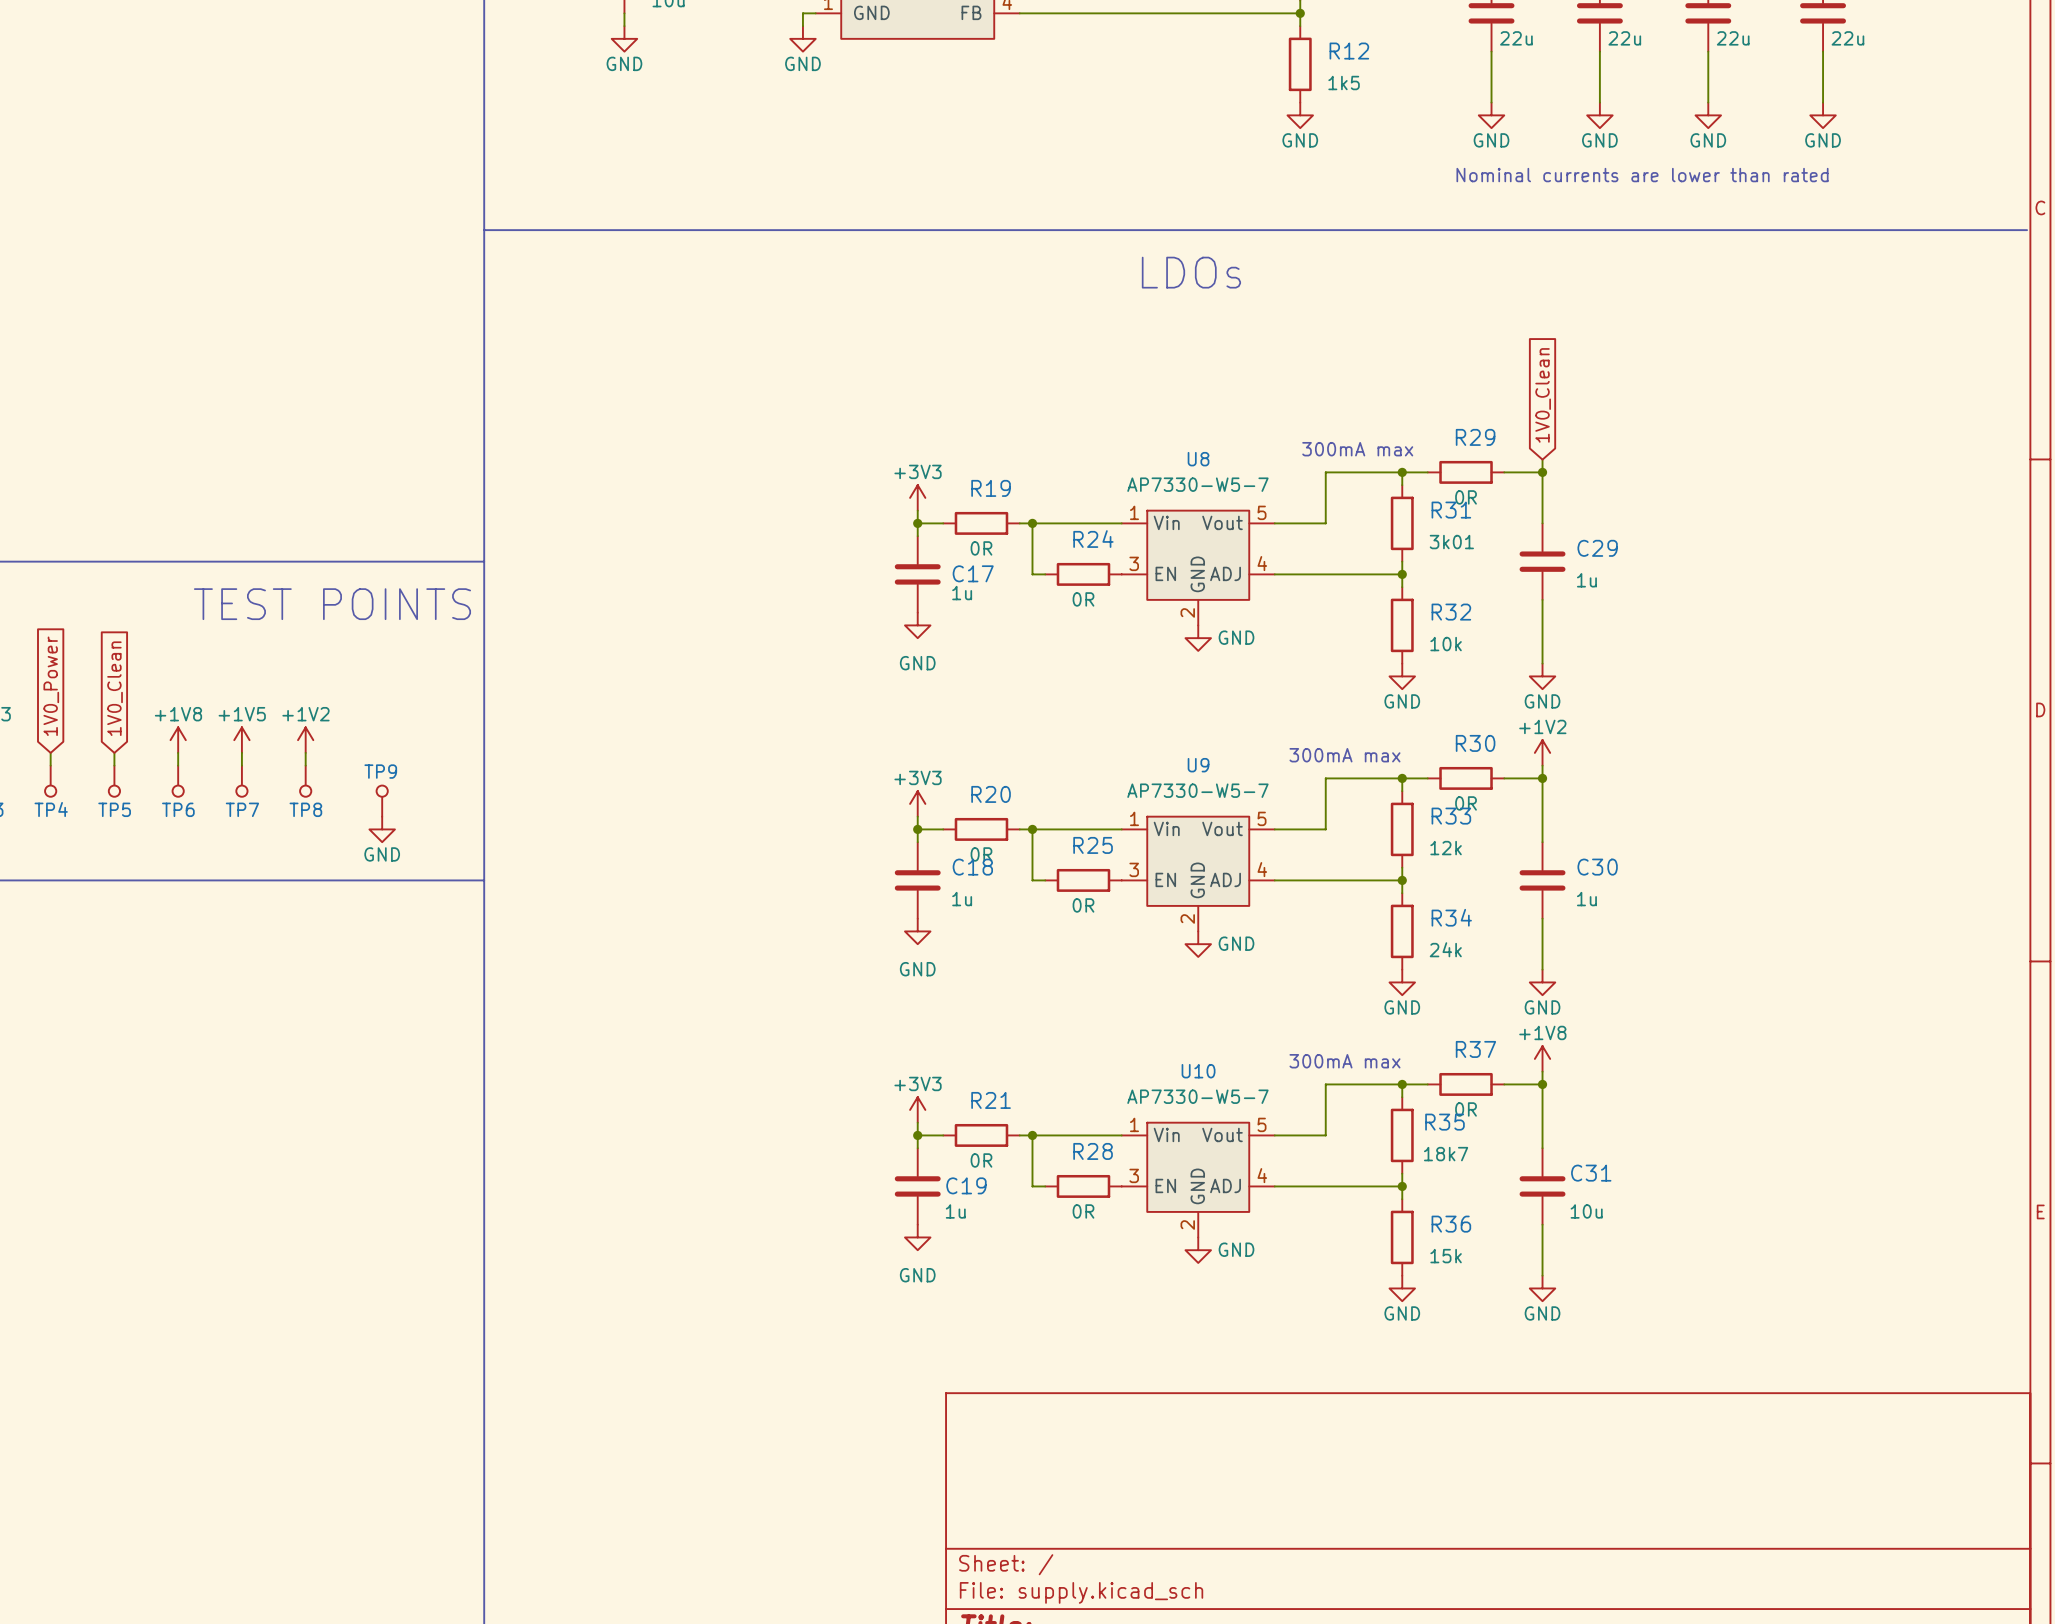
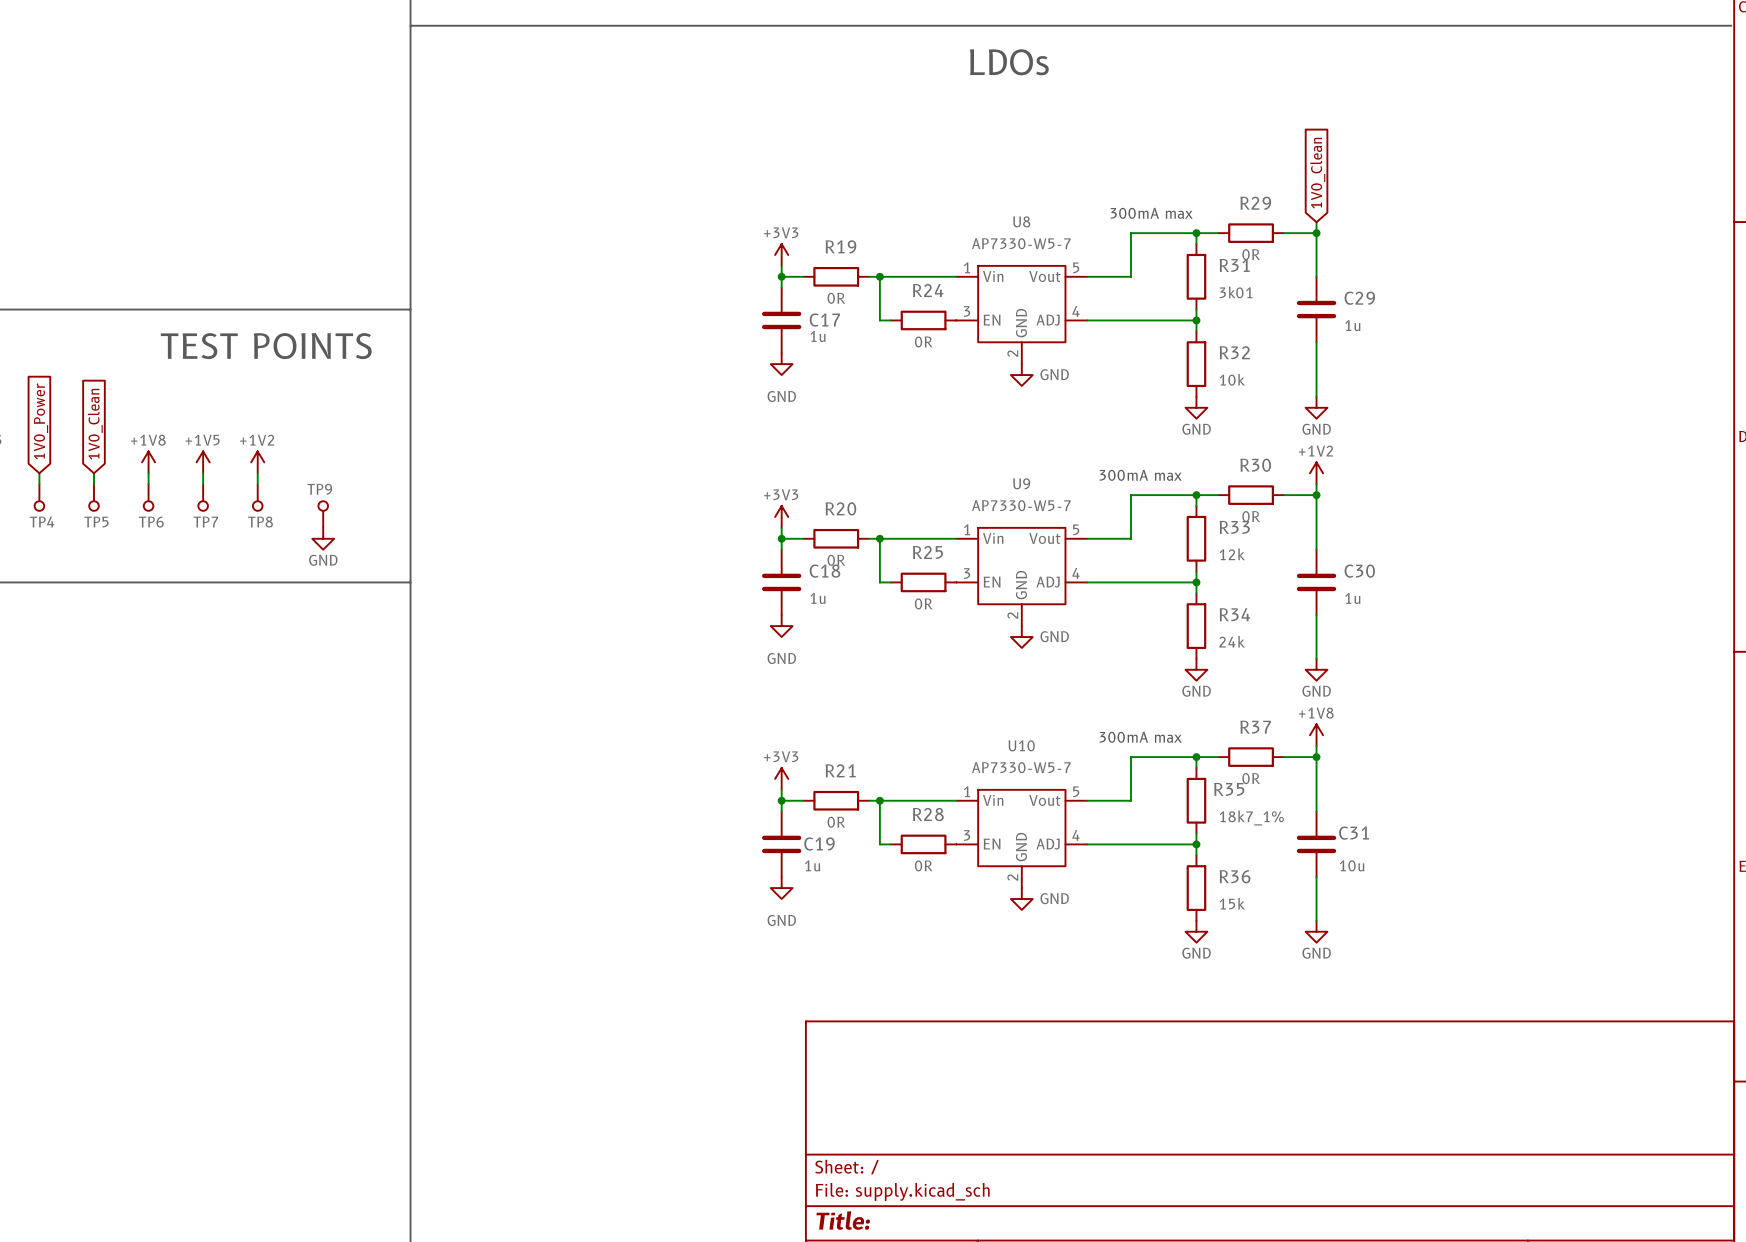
R35 text: 18k7 (1446, 1154) -> 18k7_1% (1251, 817)

